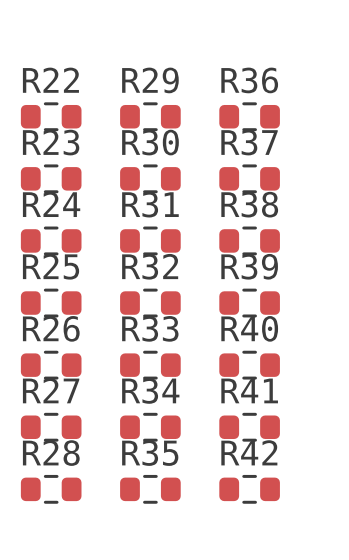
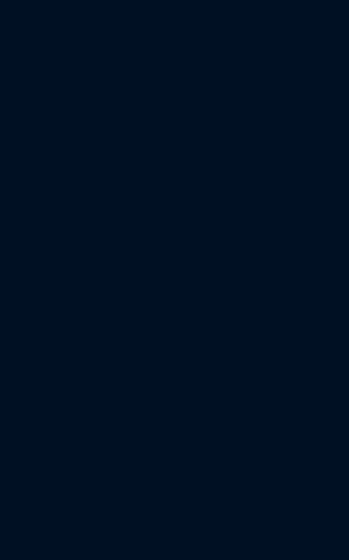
R22: (51, 116) -> none
R29: (150, 116) -> none
R36: (249, 116) -> none
R23: (51, 178) -> none
R30: (150, 178) -> none
R37: (249, 178) -> none
R24: (51, 240) -> none
R31: (150, 240) -> none
R38: (249, 240) -> none
R25: (51, 303) -> none
R32: (150, 303) -> none
R39: (249, 303) -> none
R26: (51, 365) -> none
R33: (150, 365) -> none
R40: (249, 365) -> none
R27: (51, 427) -> none
R34: (150, 427) -> none
R41: (249, 427) -> none
R28: (51, 489) -> none
R35: (150, 489) -> none
R42: (249, 489) -> none

